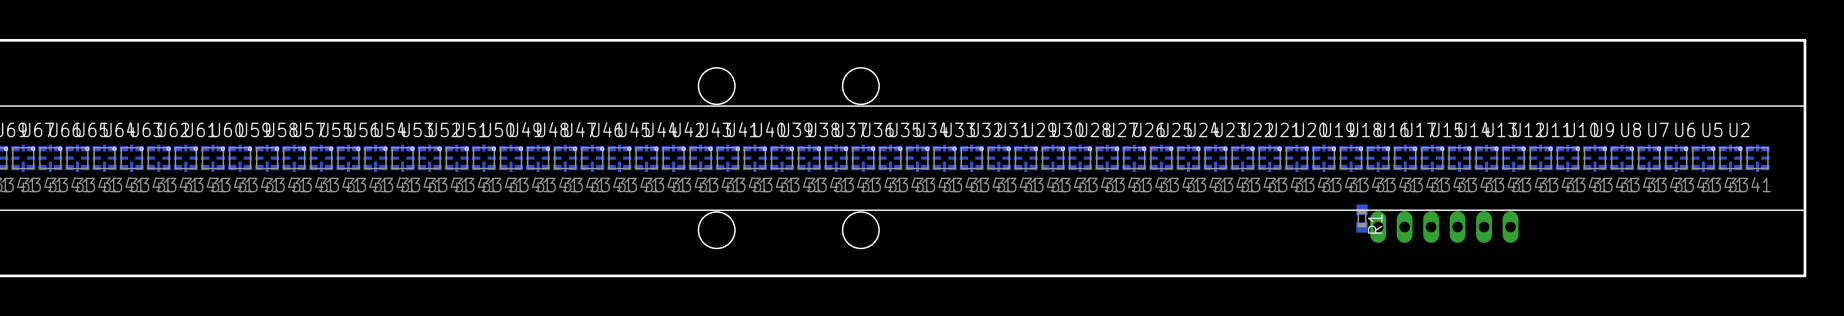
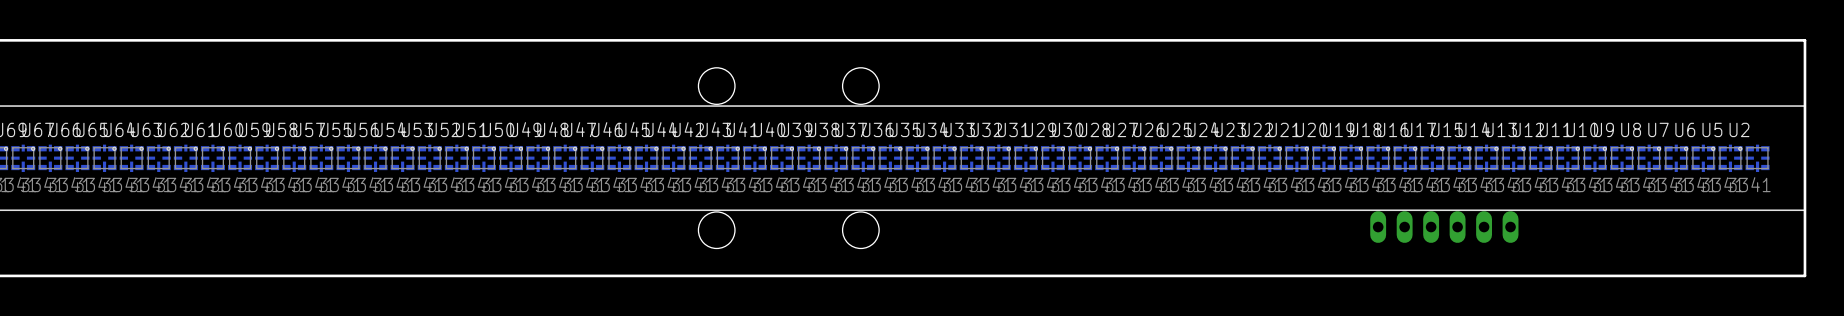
R1: (1362, 218) -> none

